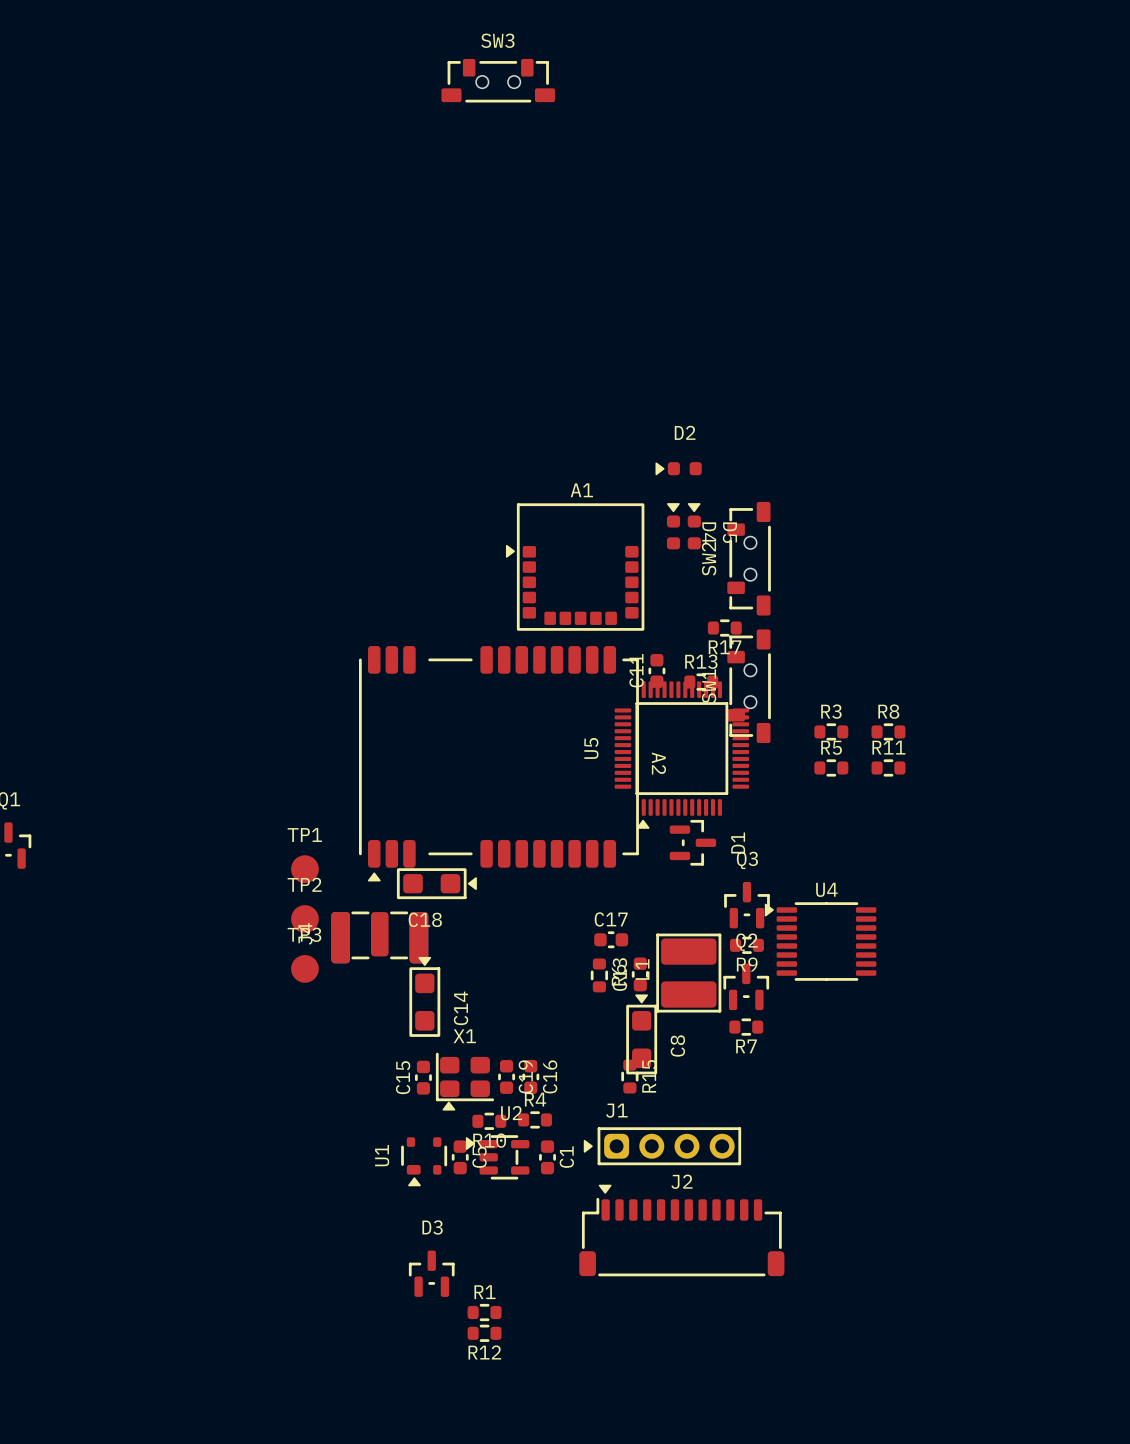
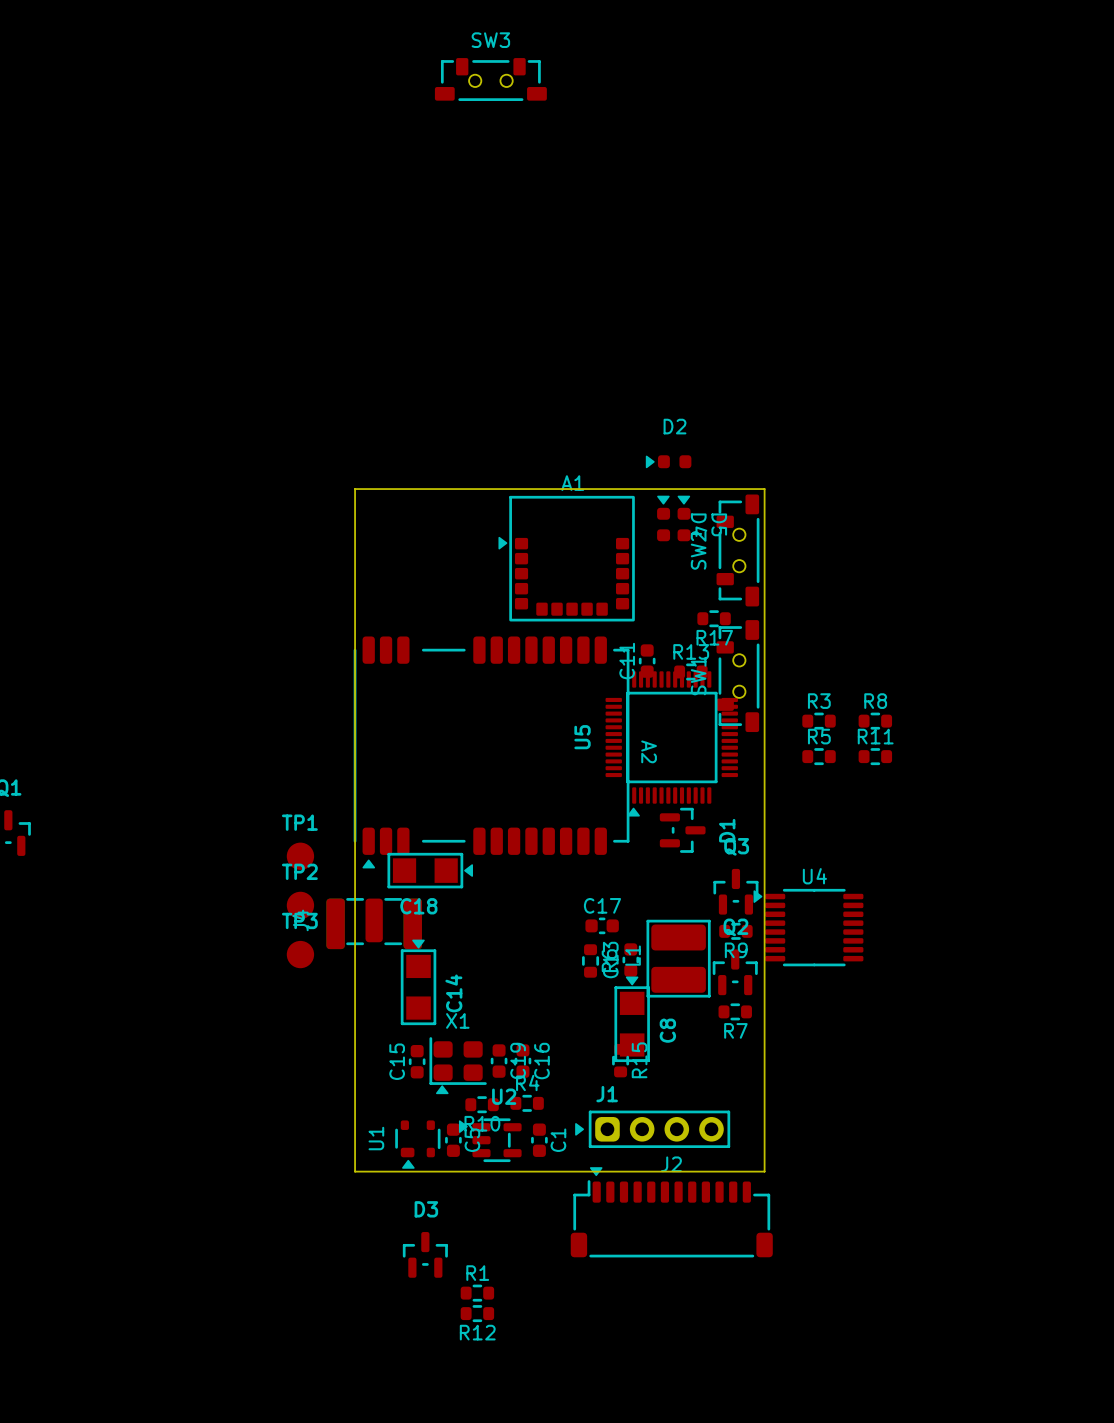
board edge: none -> (355, 489) (764, 489) (764, 1171) (355, 1171) (355, 489)
C18 footprint: [396, 868, 477, 900] -> [387, 852, 474, 889]
C14 footprint: [409, 956, 441, 1037] -> [400, 939, 437, 1026]
C8 footprint: [626, 994, 658, 1075] -> [614, 976, 650, 1063]

